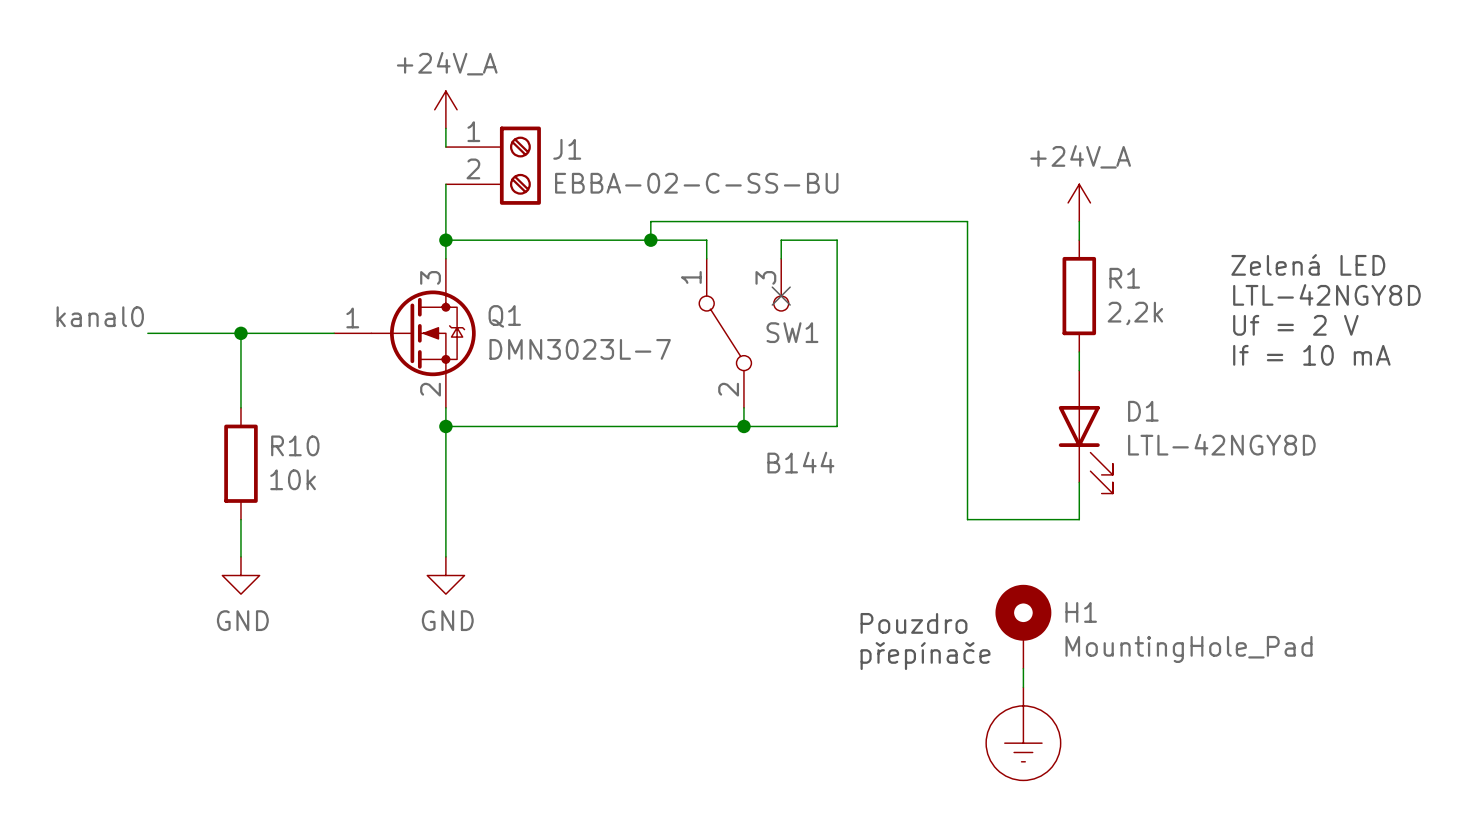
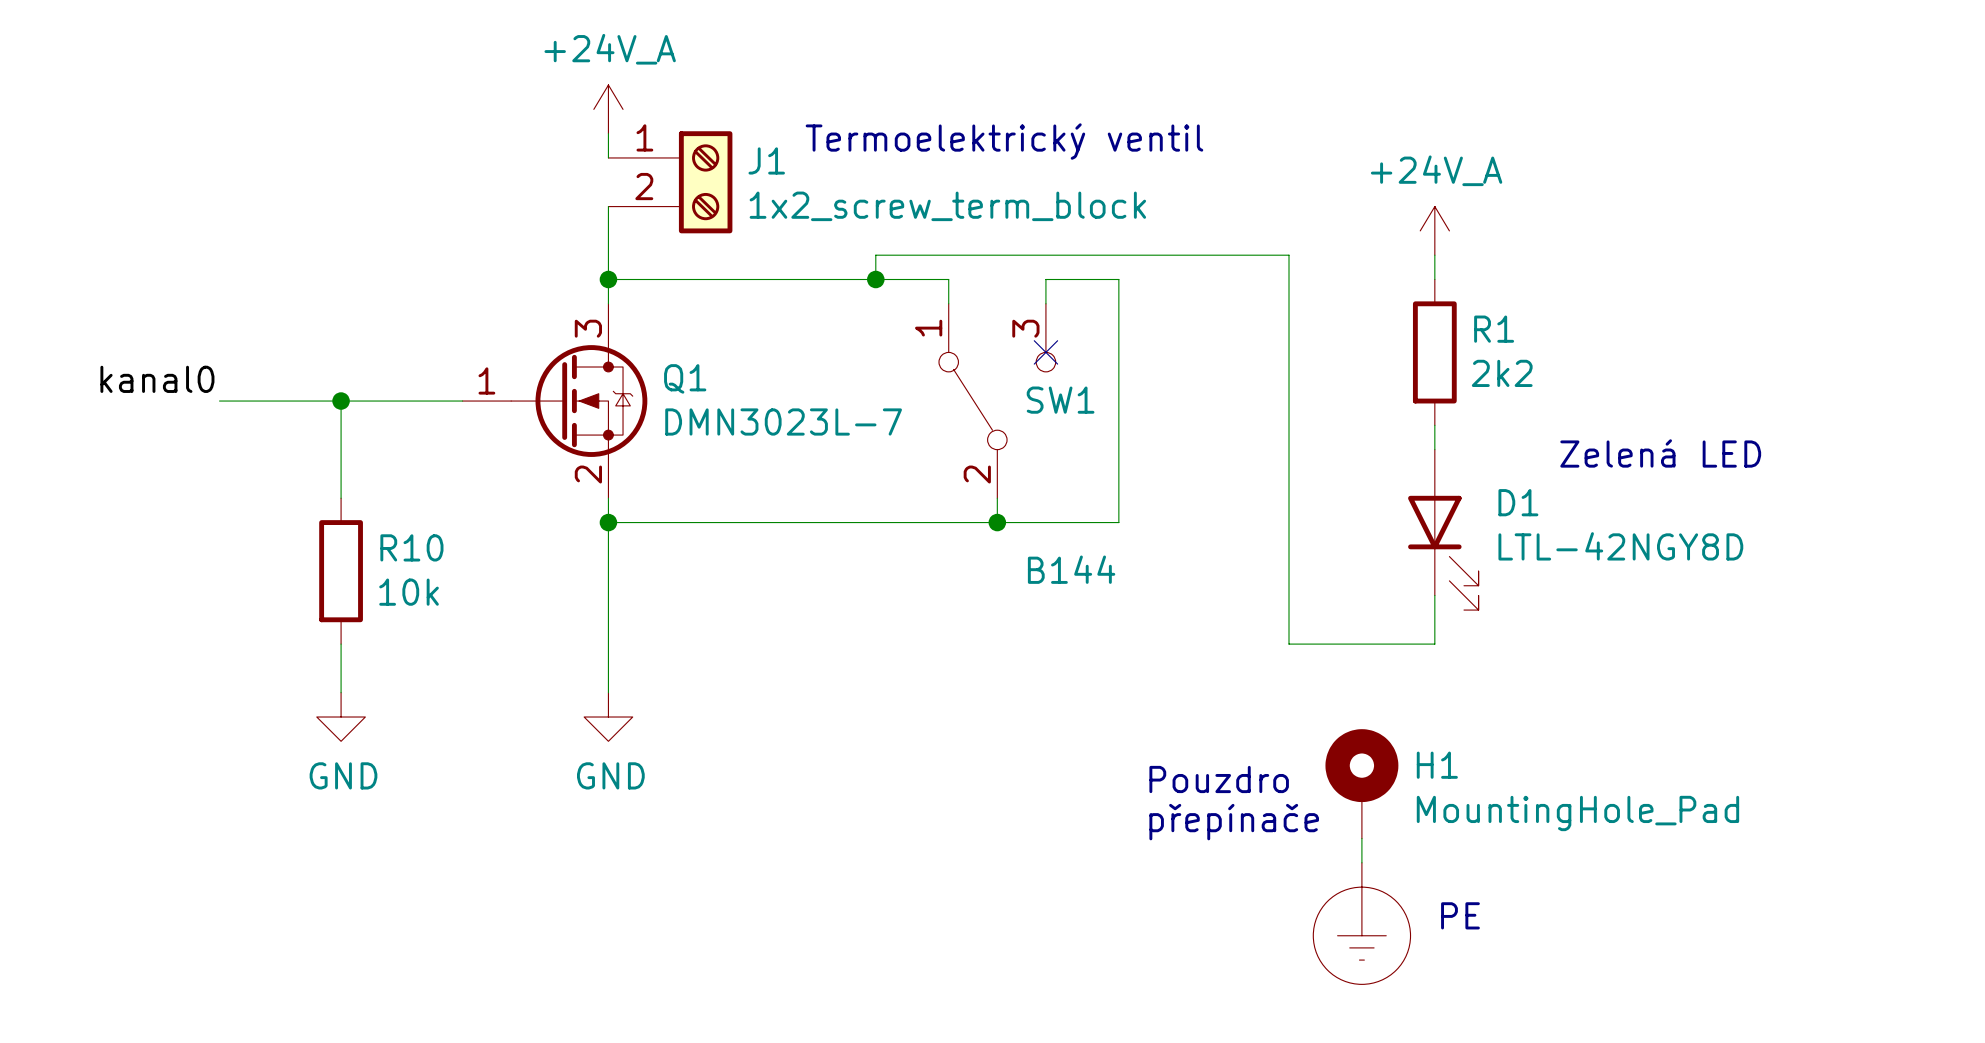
text: none -> Termoelektrický ventil (1004, 141)
J1 value: EBBA-02-C-SS-BU (696, 183) -> 1x2_screw_term_block (947, 206)
text position: Zelená LED (1308, 264) -> Zelená LED (1660, 453)
text: LTL-42NGY8D (1326, 294) -> none
R1 value: 2,2k (1135, 313) -> 2k2 (1502, 373)
text: Uf = 2 V (1295, 325) -> none
text: If = 10 mA (1311, 355) -> none
text: none -> PE (1460, 915)

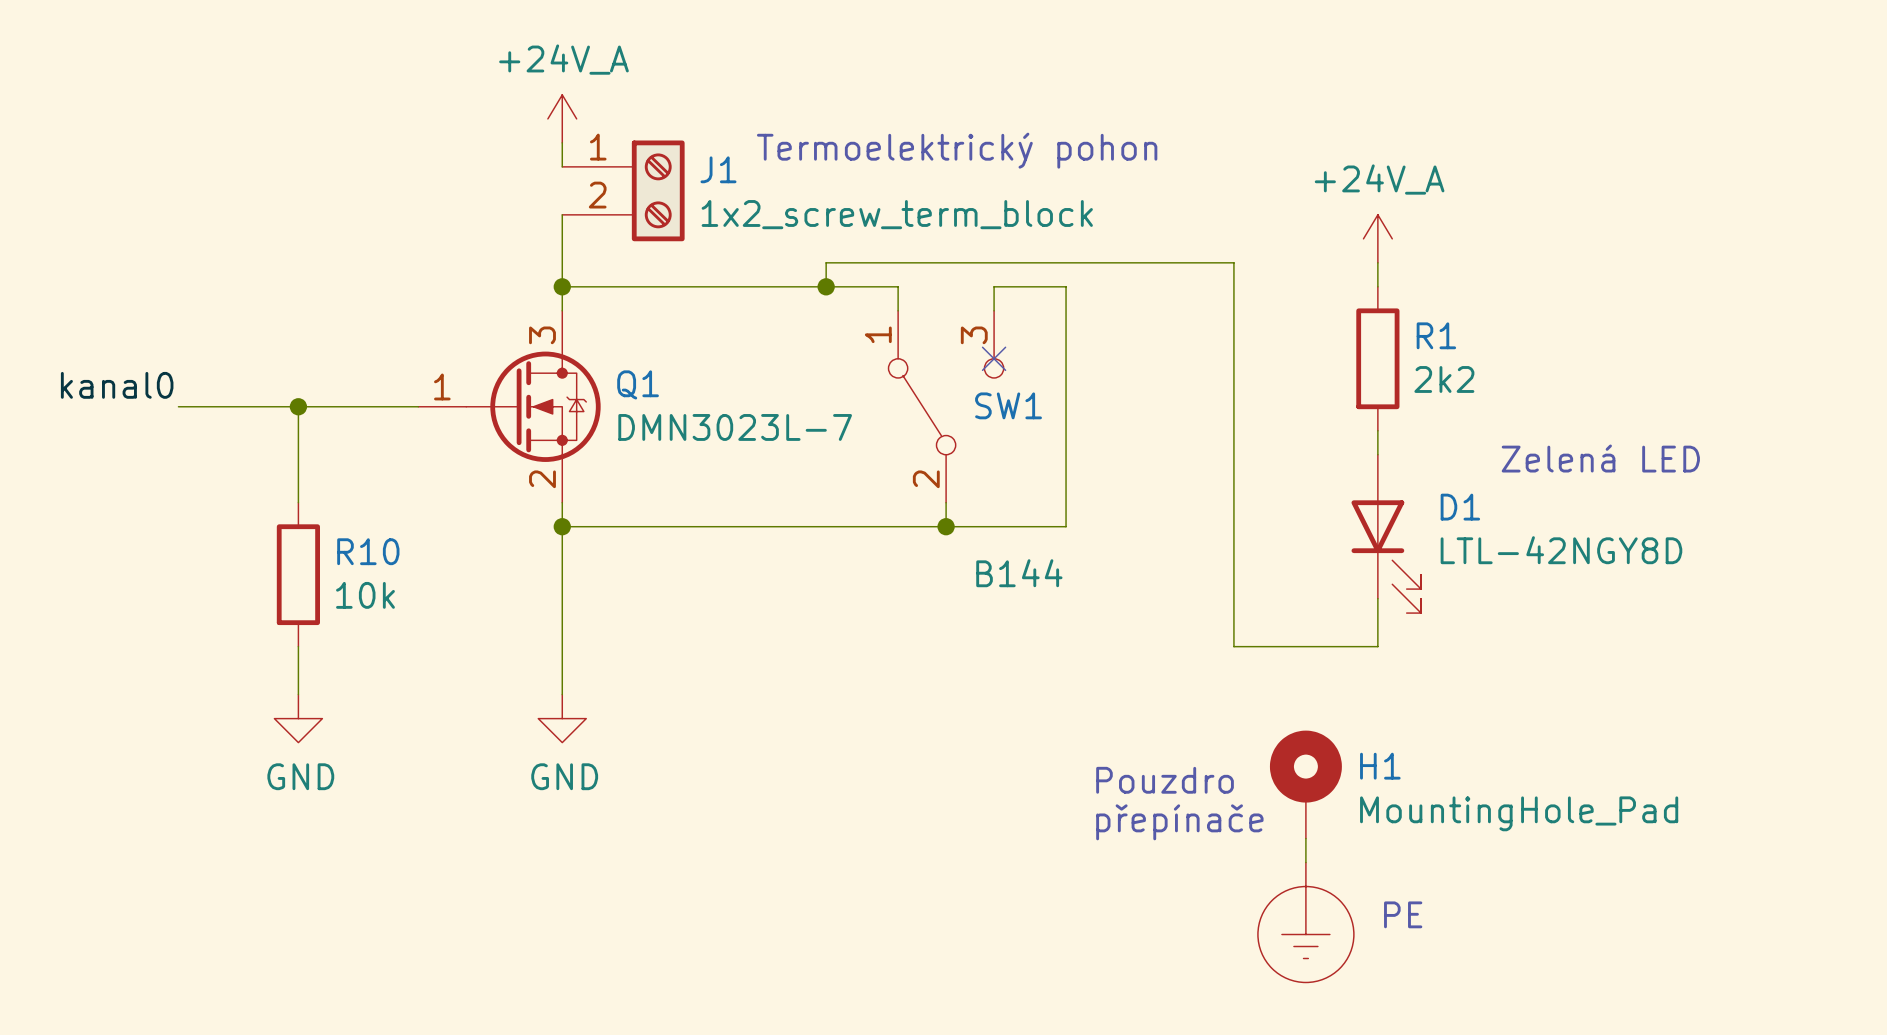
text: Termoelektrický ventil (1004, 141) -> Termoelektrický pohon (957, 150)

